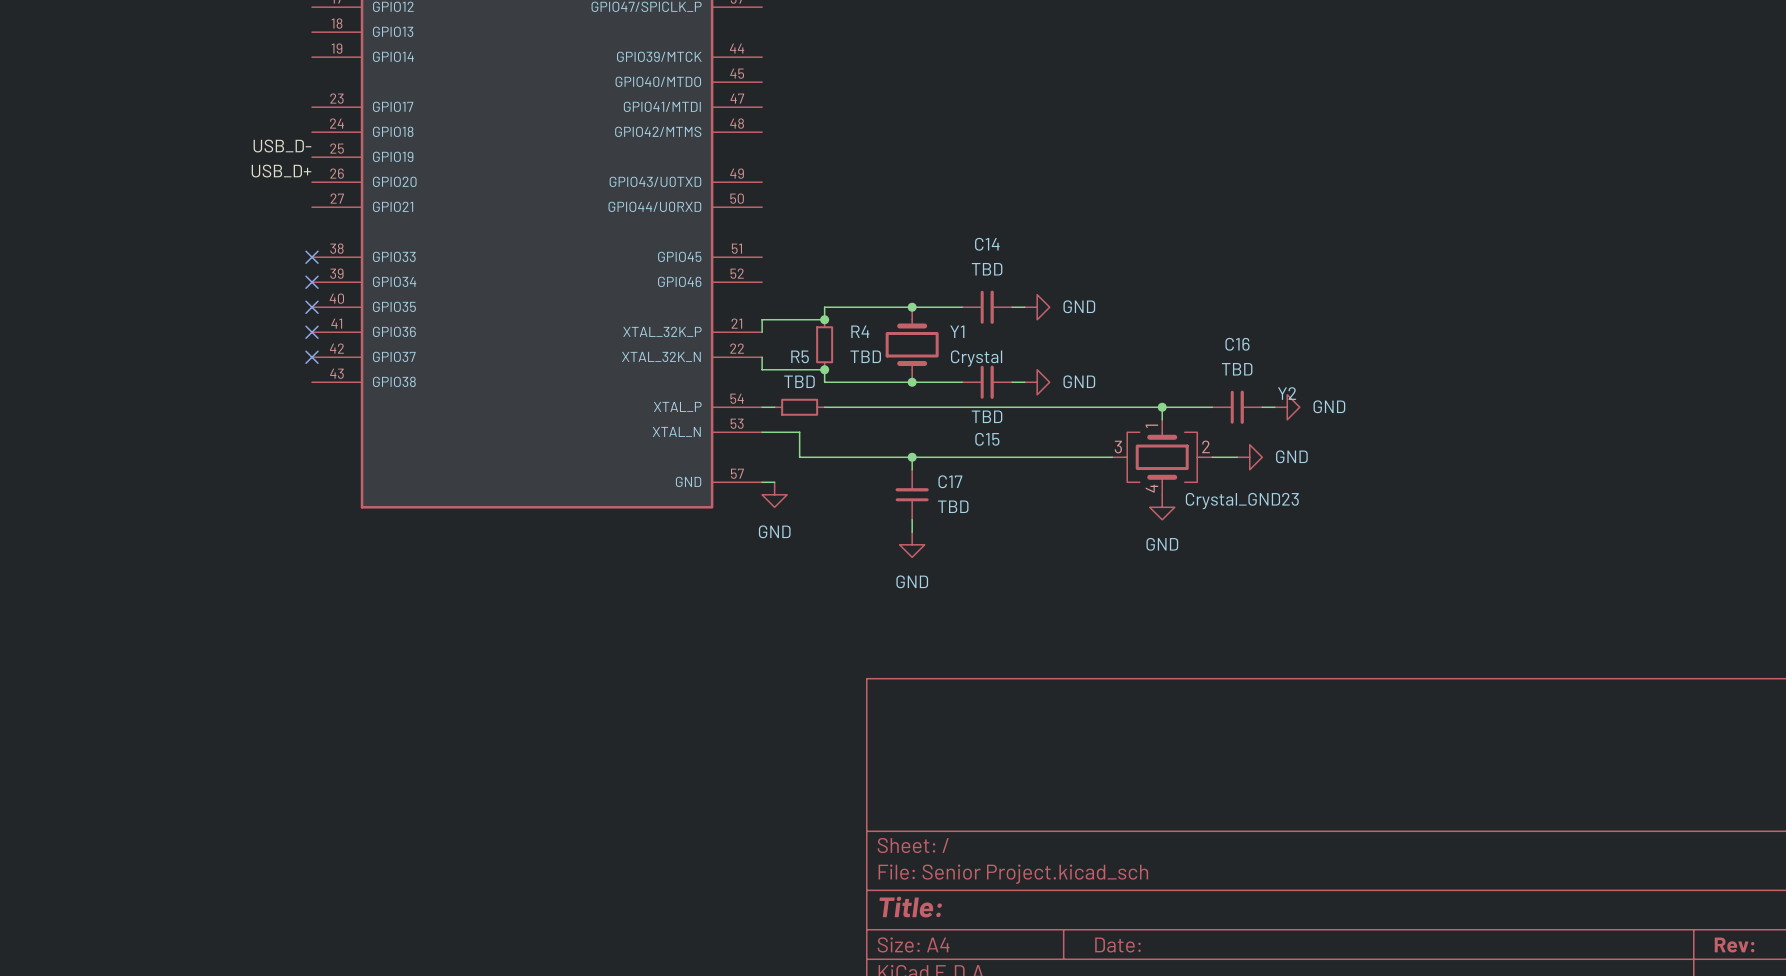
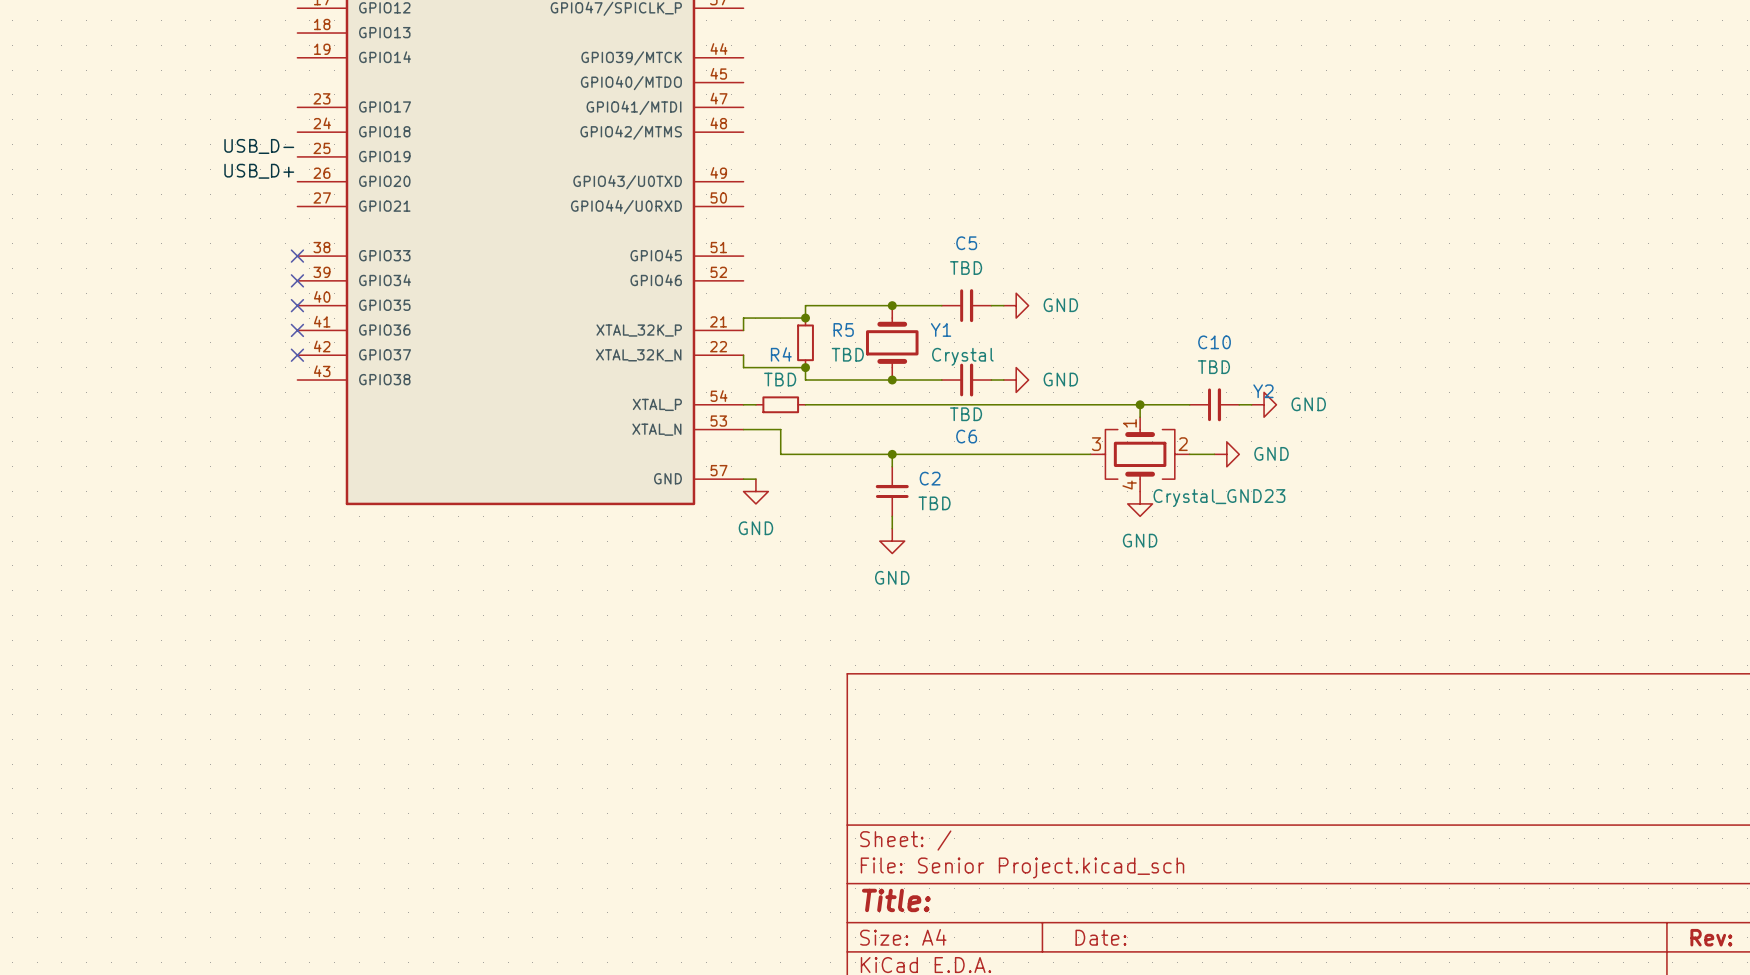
C14 name: C14 (987, 244) -> C5 (966, 243)
R4 name: R4 (860, 331) -> R5 (843, 329)
C16 name: C16 (1237, 344) -> C10 (1214, 342)
R5 name: R5 (800, 356) -> R4 (781, 354)
C15 name: C15 (987, 439) -> C6 (966, 436)
C17 name: C17 (950, 481) -> C2 (930, 478)

